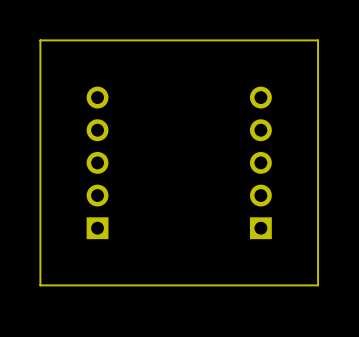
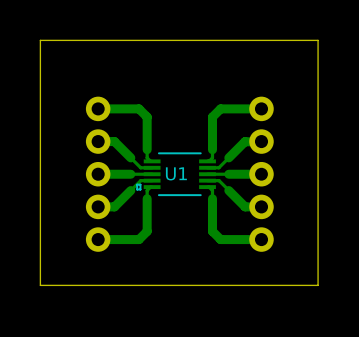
part footprint: [86, 86, 109, 240] -> [85, 96, 111, 252]
part footprint: [249, 86, 272, 240] -> [249, 96, 274, 252]
track: none -> (98, 108) (138, 108) (147, 117) (147, 157) (152, 161)
track: none -> (261, 108) (220, 108) (212, 117) (212, 157) (207, 161)
track: none -> (98, 141) (114, 141) (140, 167) (152, 167)
track: none -> (261, 141) (244, 141) (218, 167) (207, 167)
track: none -> (152, 174) (98, 174)
U1: none -> (176, 174)
track: none -> (261, 174) (207, 174)
track: none -> (152, 180) (140, 180) (114, 206) (98, 206)
track: none -> (207, 180) (219, 180) (228, 190)
track: none -> (152, 187) (147, 190) (147, 231) (138, 239) (98, 239)
track: none -> (207, 187) (212, 190) (212, 231) (220, 239) (261, 239)
track: none -> (228, 190) (245, 206) (261, 206)

